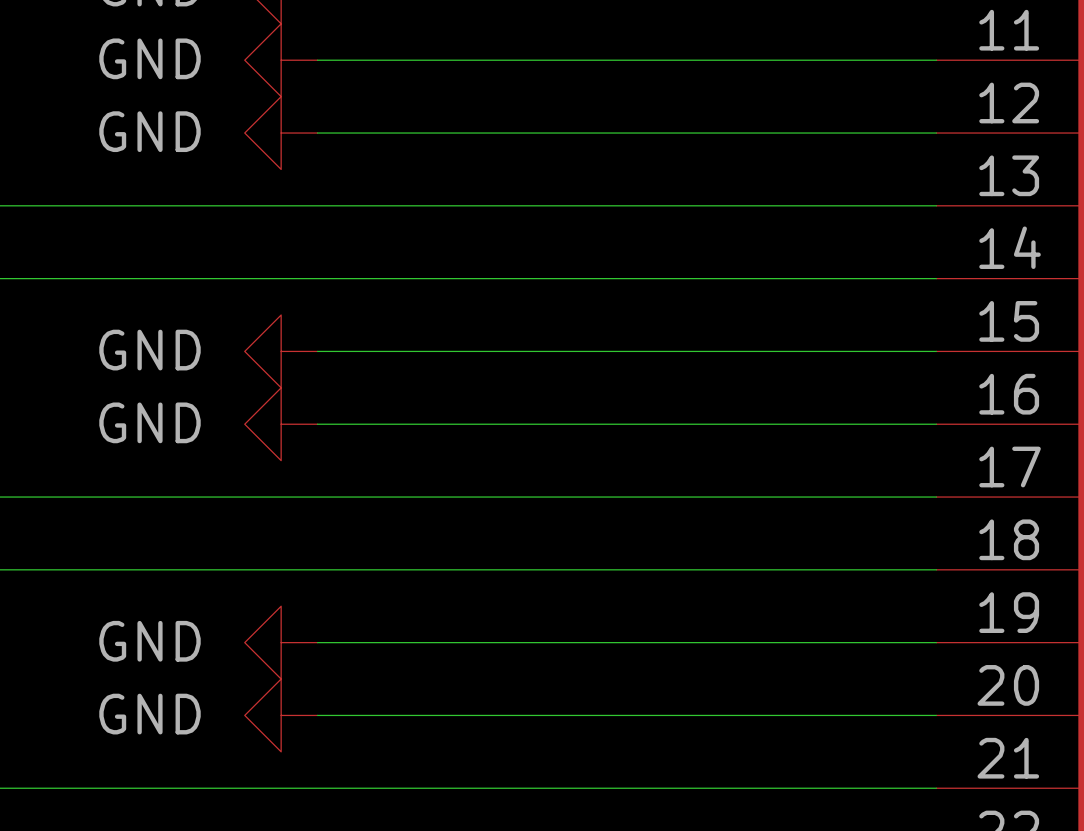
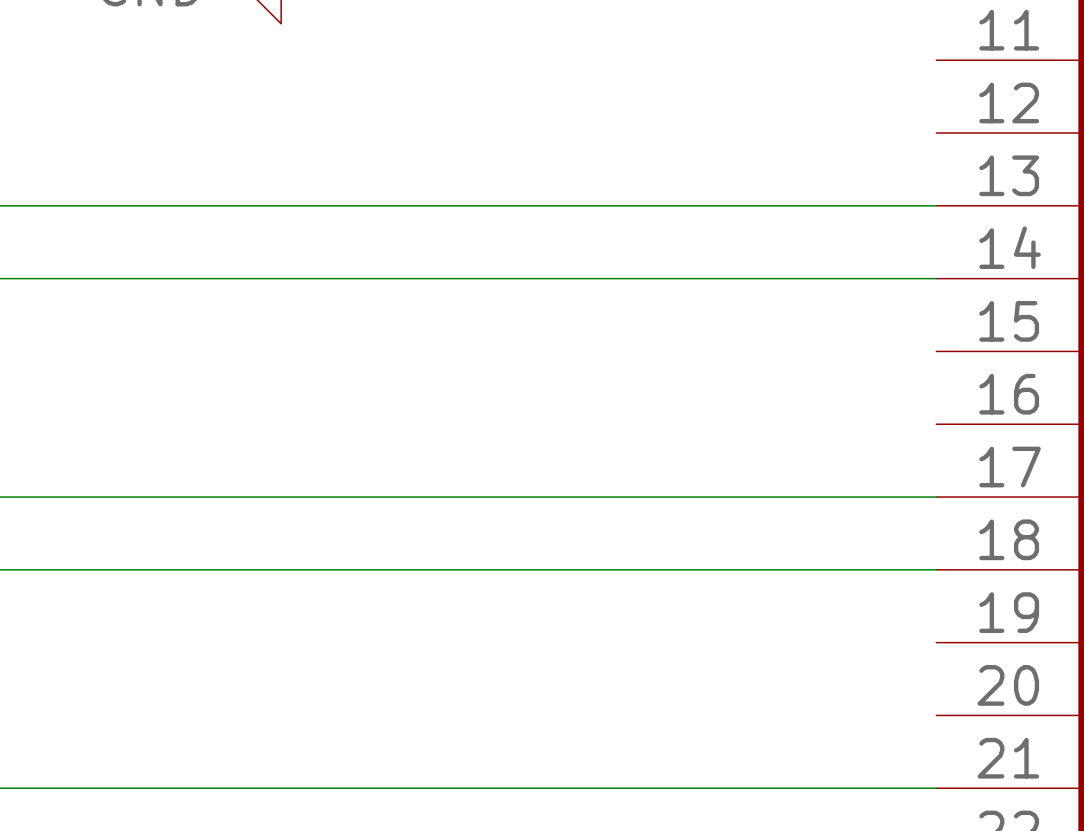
power symbol: GND (281, 60) -> none
wire: (317, 60) (936, 60) -> none
power symbol: GND (281, 133) -> none
wire: (317, 133) (936, 133) -> none
power symbol: GND (281, 351) -> none
wire: (317, 351) (936, 351) -> none
power symbol: GND (281, 424) -> none
wire: (317, 424) (936, 424) -> none
power symbol: GND (281, 642) -> none
wire: (317, 642) (936, 642) -> none
power symbol: GND (281, 715) -> none
wire: (317, 715) (936, 715) -> none

